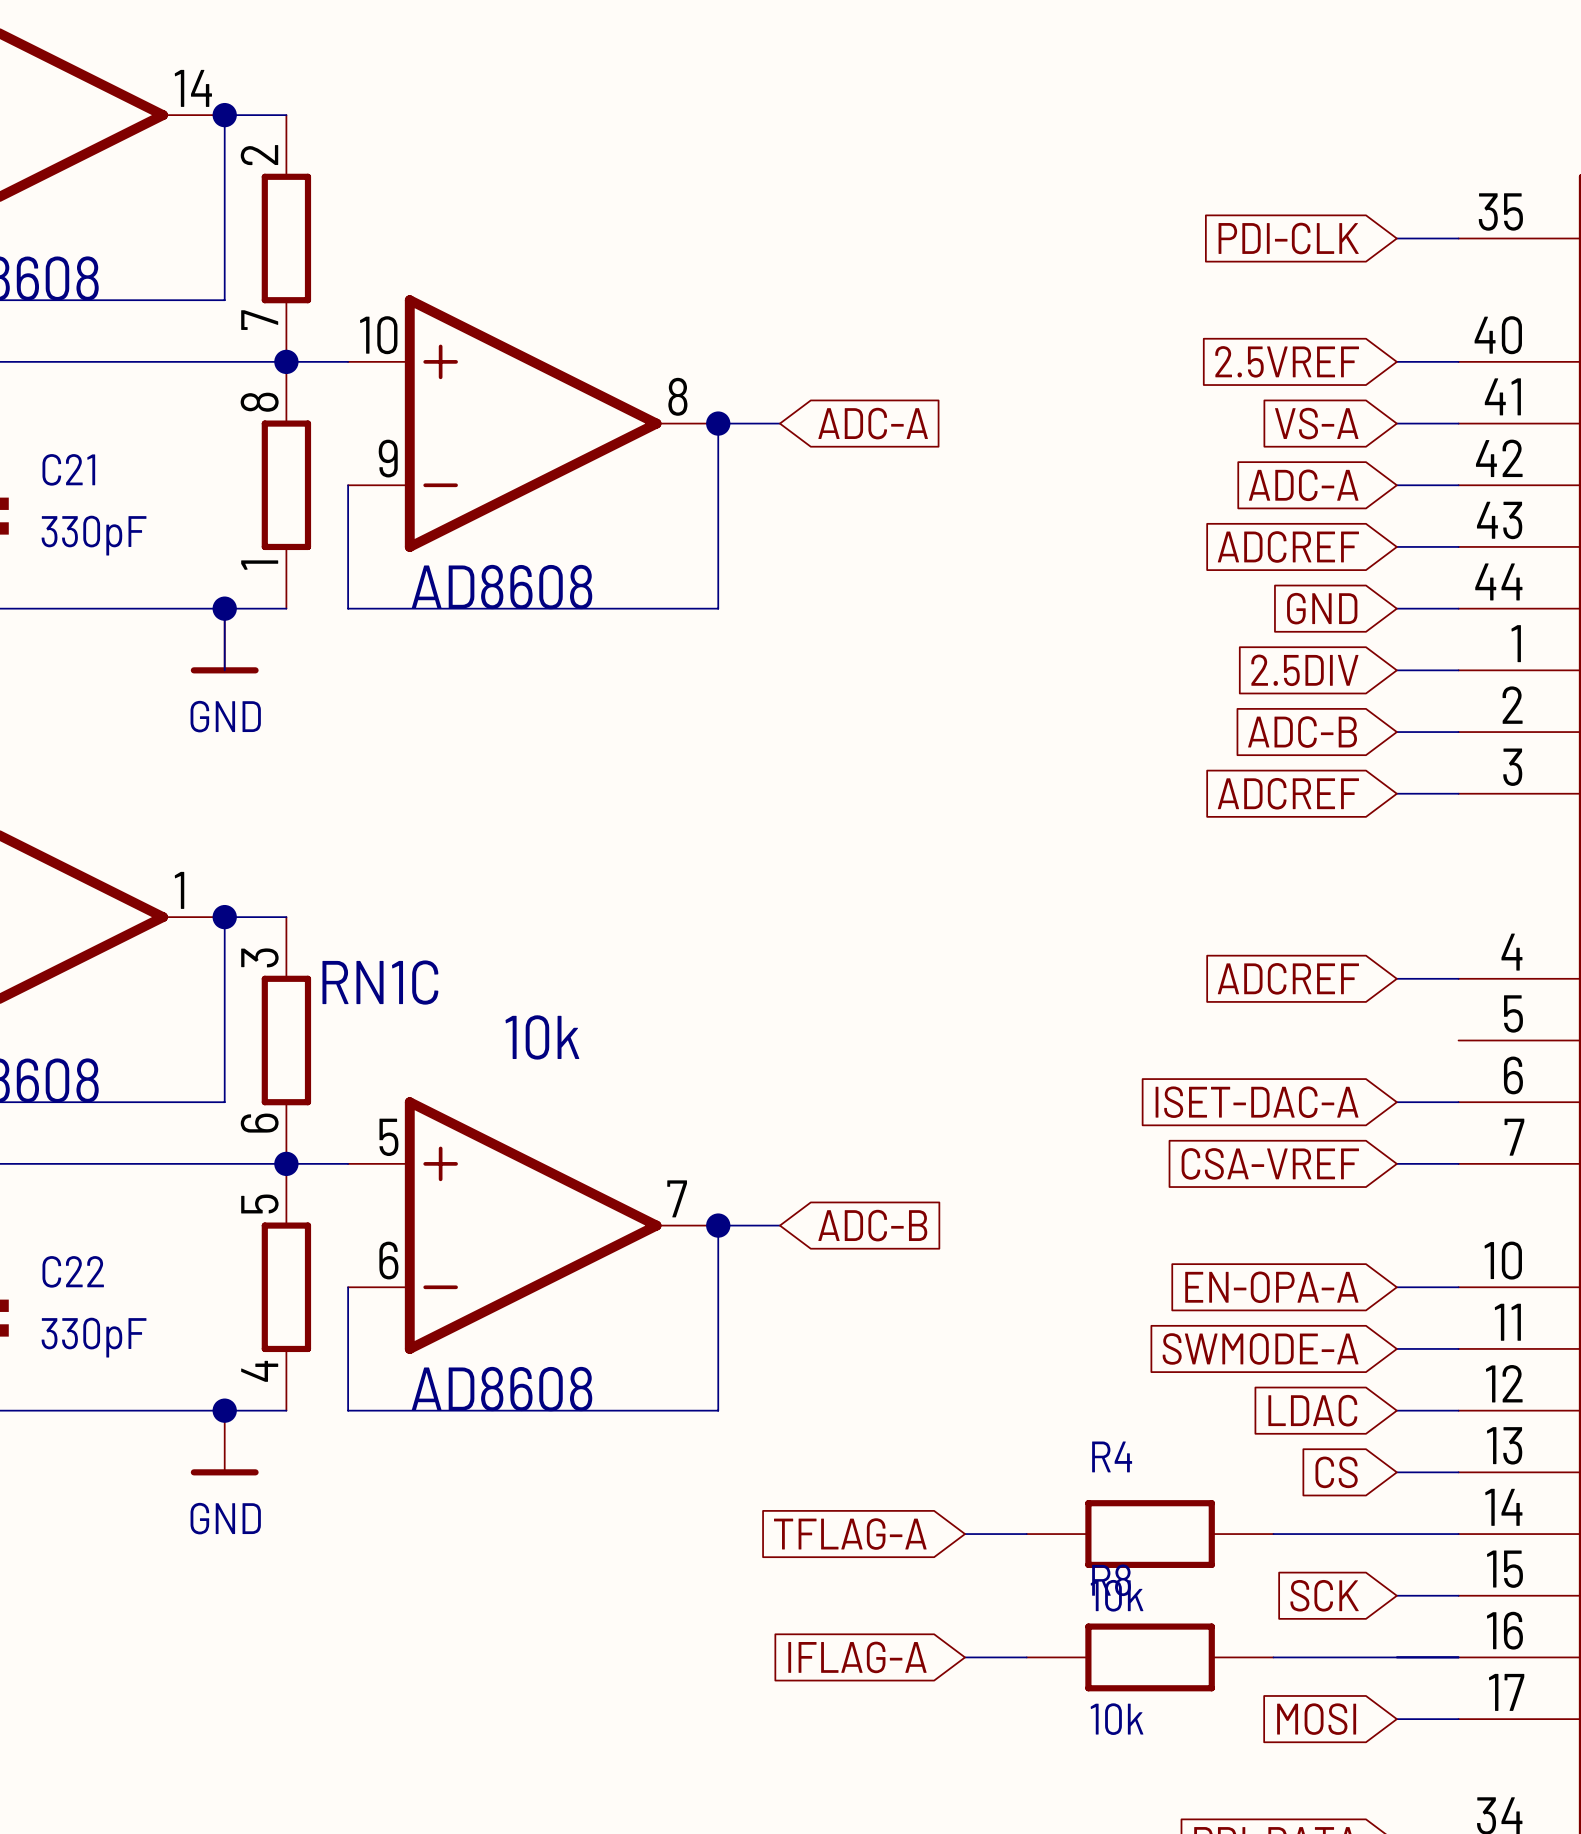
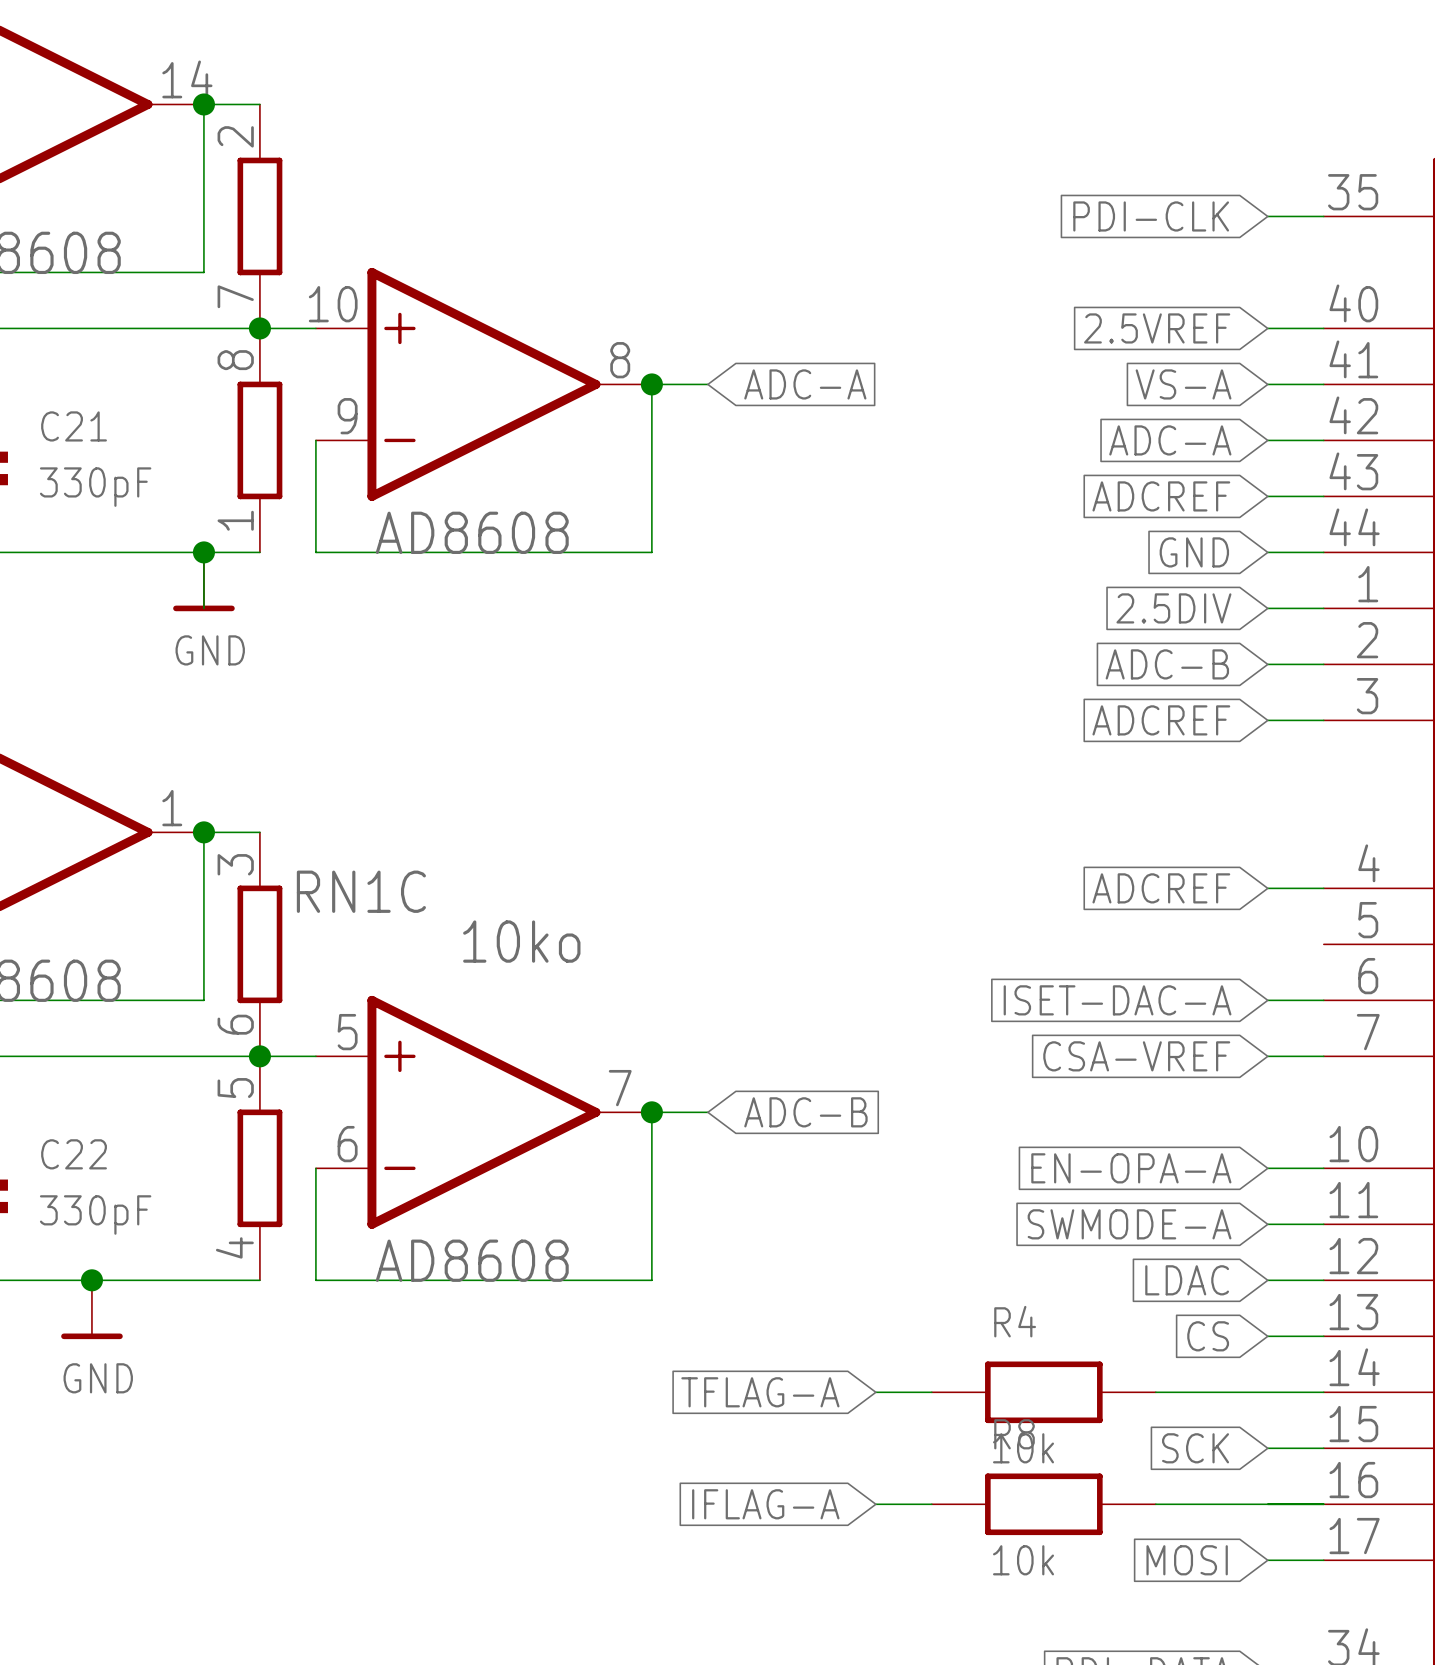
RN1C value: 10k (542, 1037) -> 10ko (521, 941)
junction position: (224, 1410) -> (91, 1280)
power symbol position: GND (224, 1443) -> GND (91, 1309)

